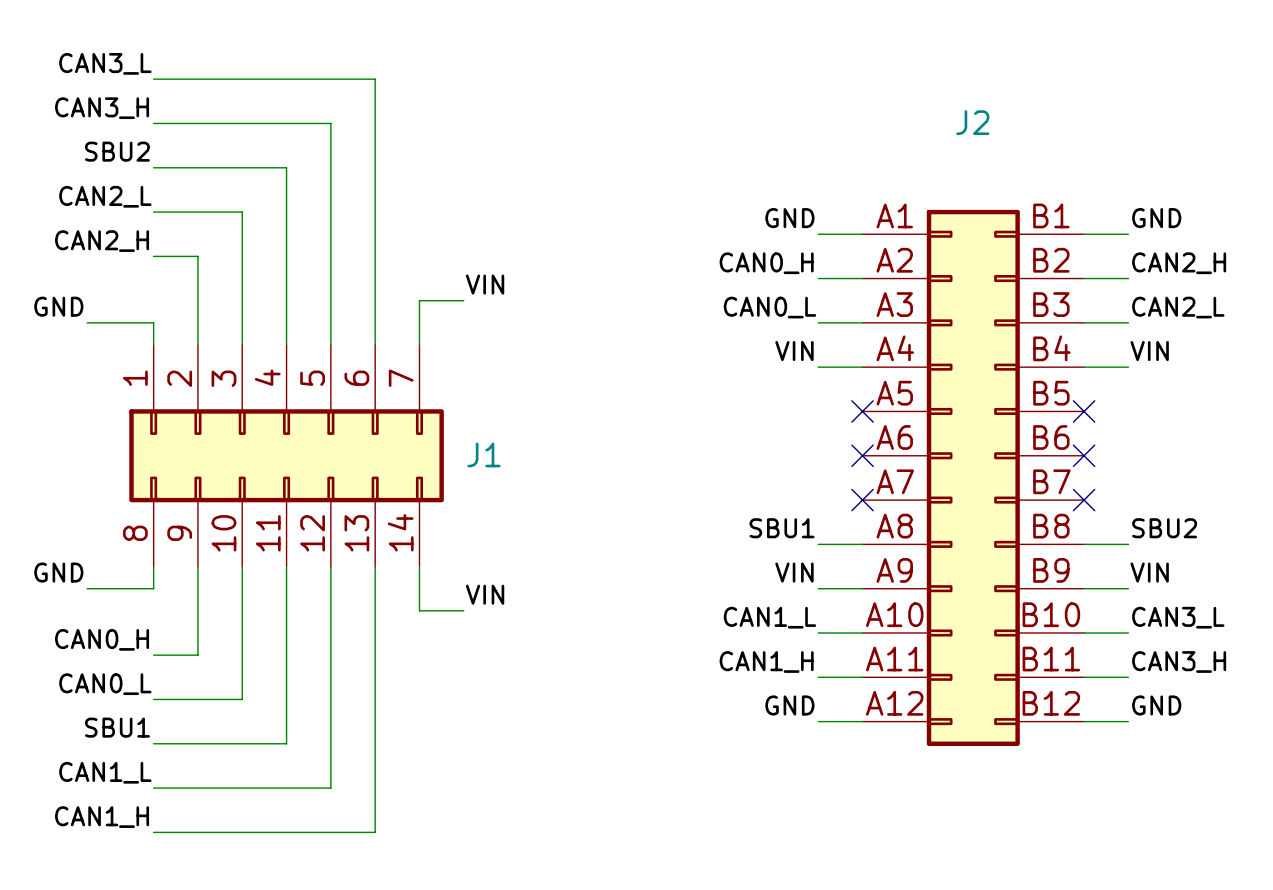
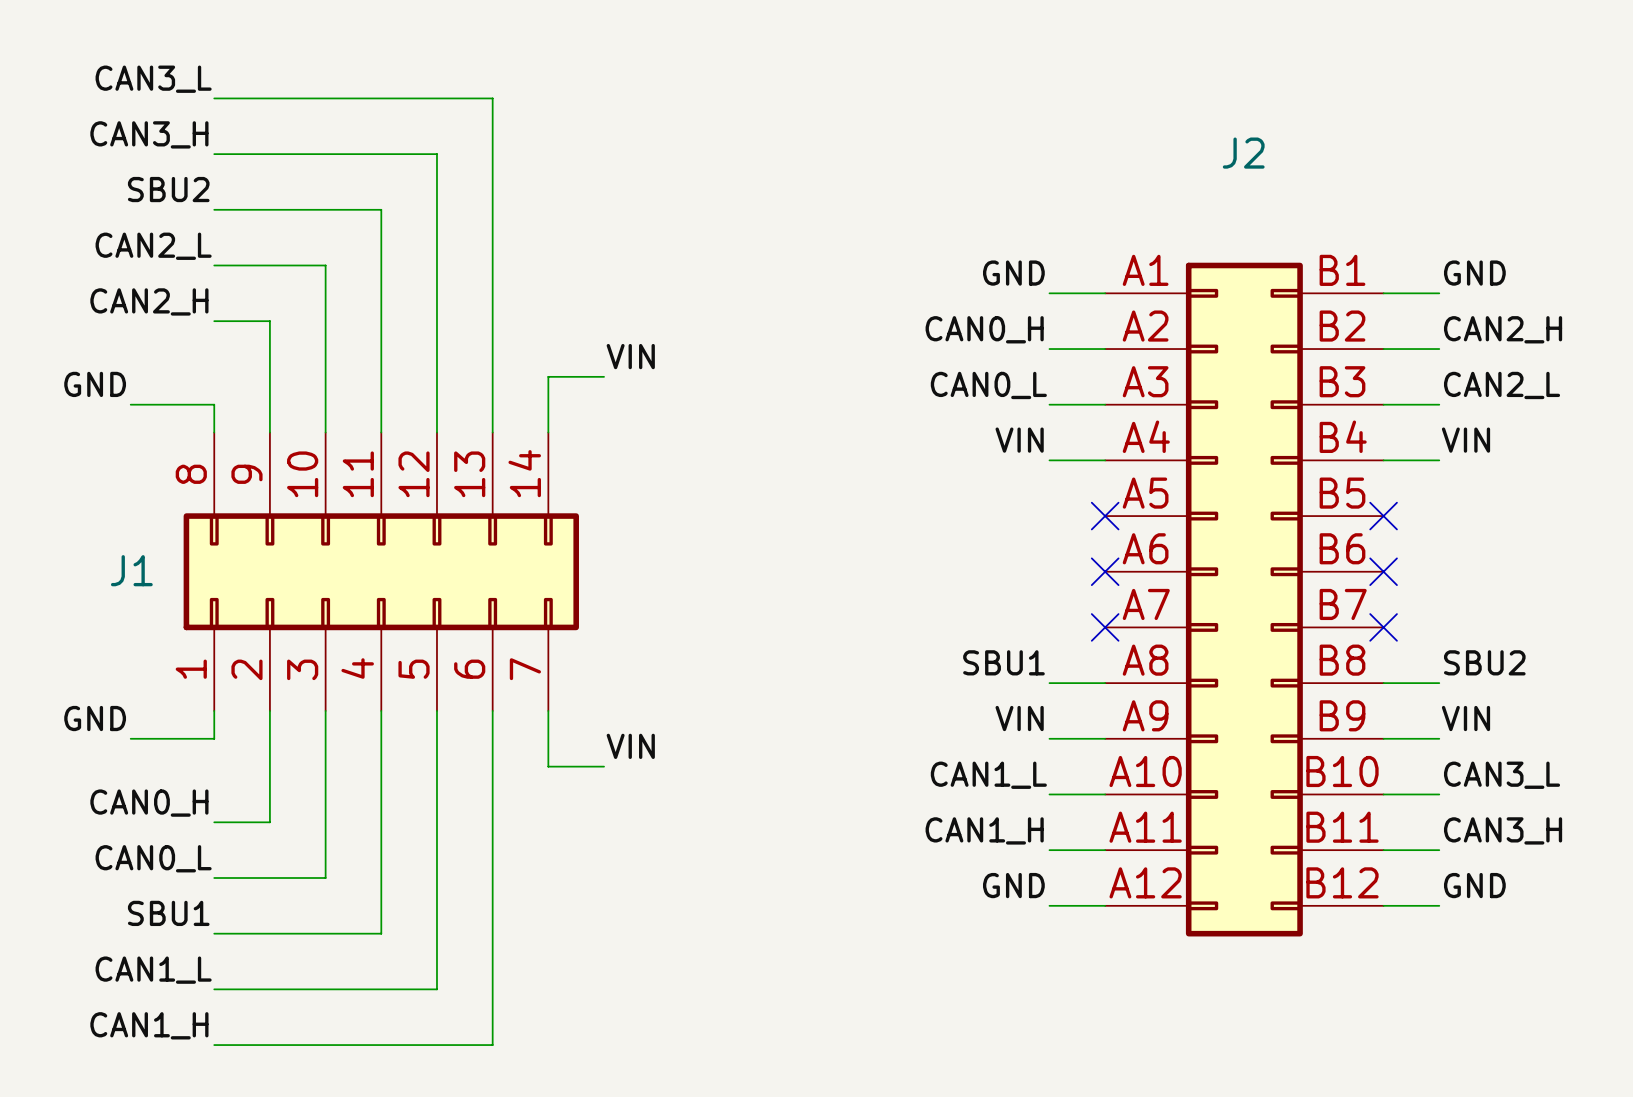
J1 name position: J1 (483, 454) -> J1 (131, 570)
J1 flip: as is (286, 455) -> up-down (381, 571)

